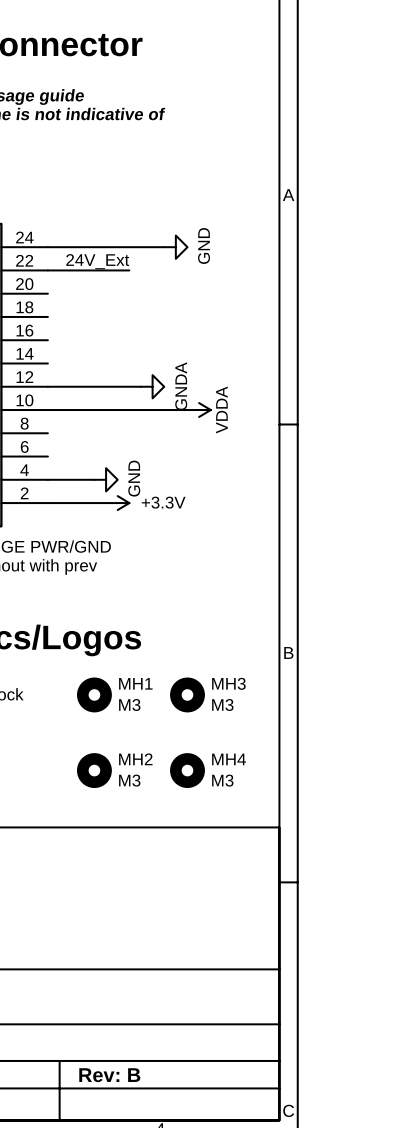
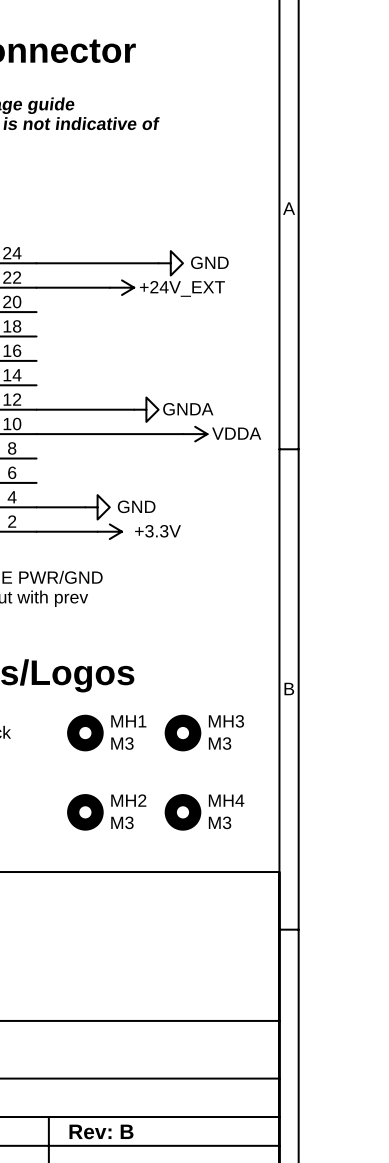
power symbol text rotation: 0° (204, 246) -> 90° clockwise (209, 262)
label: 24V_Ext (97, 261) -> none
power symbol: none -> +24V_EXT (121, 287)
power symbol text rotation: 0° (181, 386) -> 90° clockwise (188, 409)
power symbol text rotation: 0° (221, 409) -> 90° clockwise (236, 433)
power symbol text rotation: 0° (134, 478) -> 90° clockwise (136, 506)

